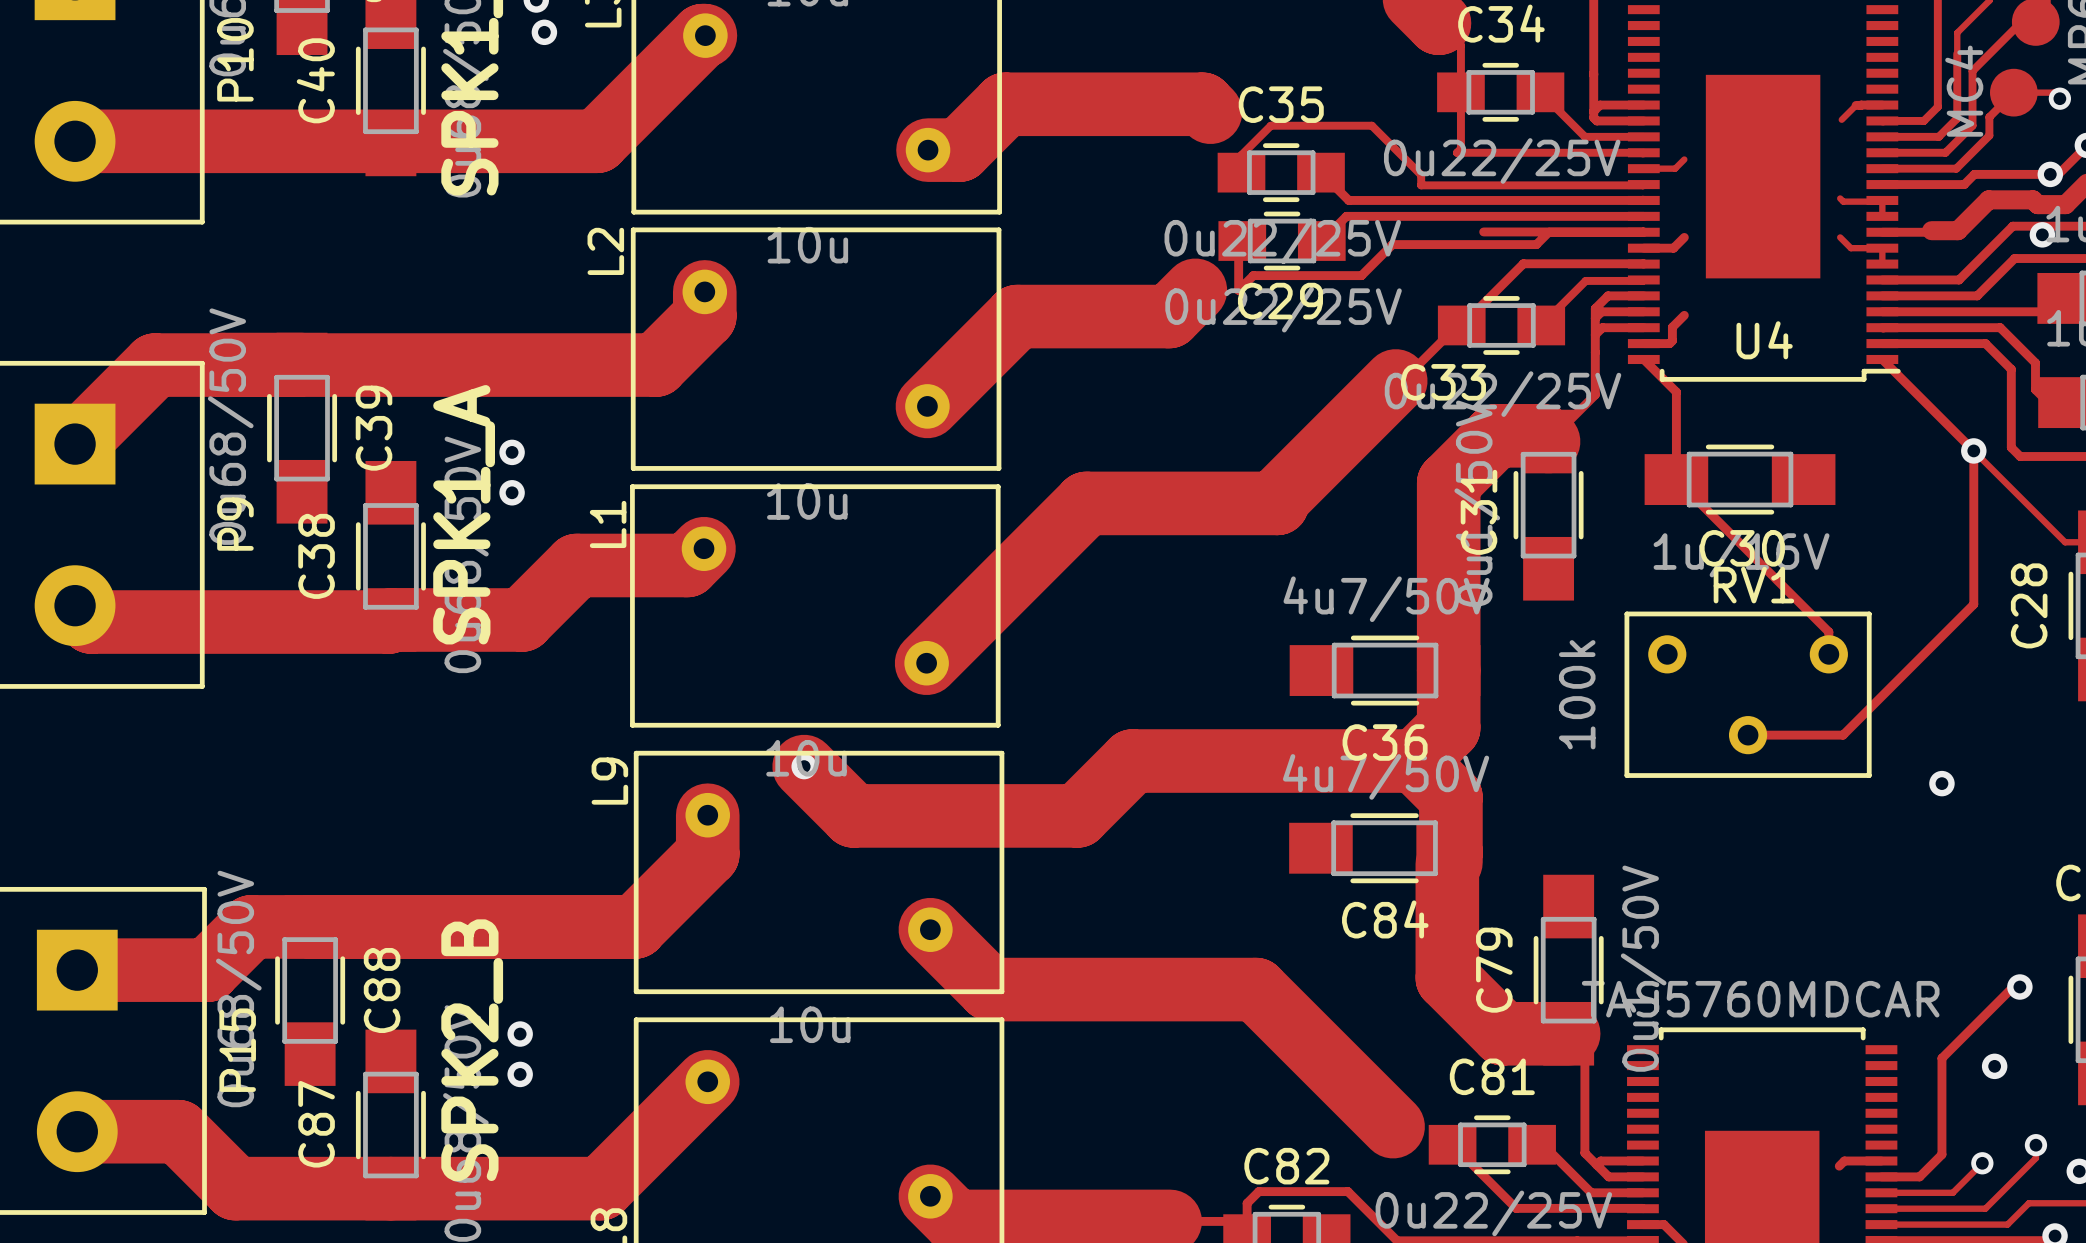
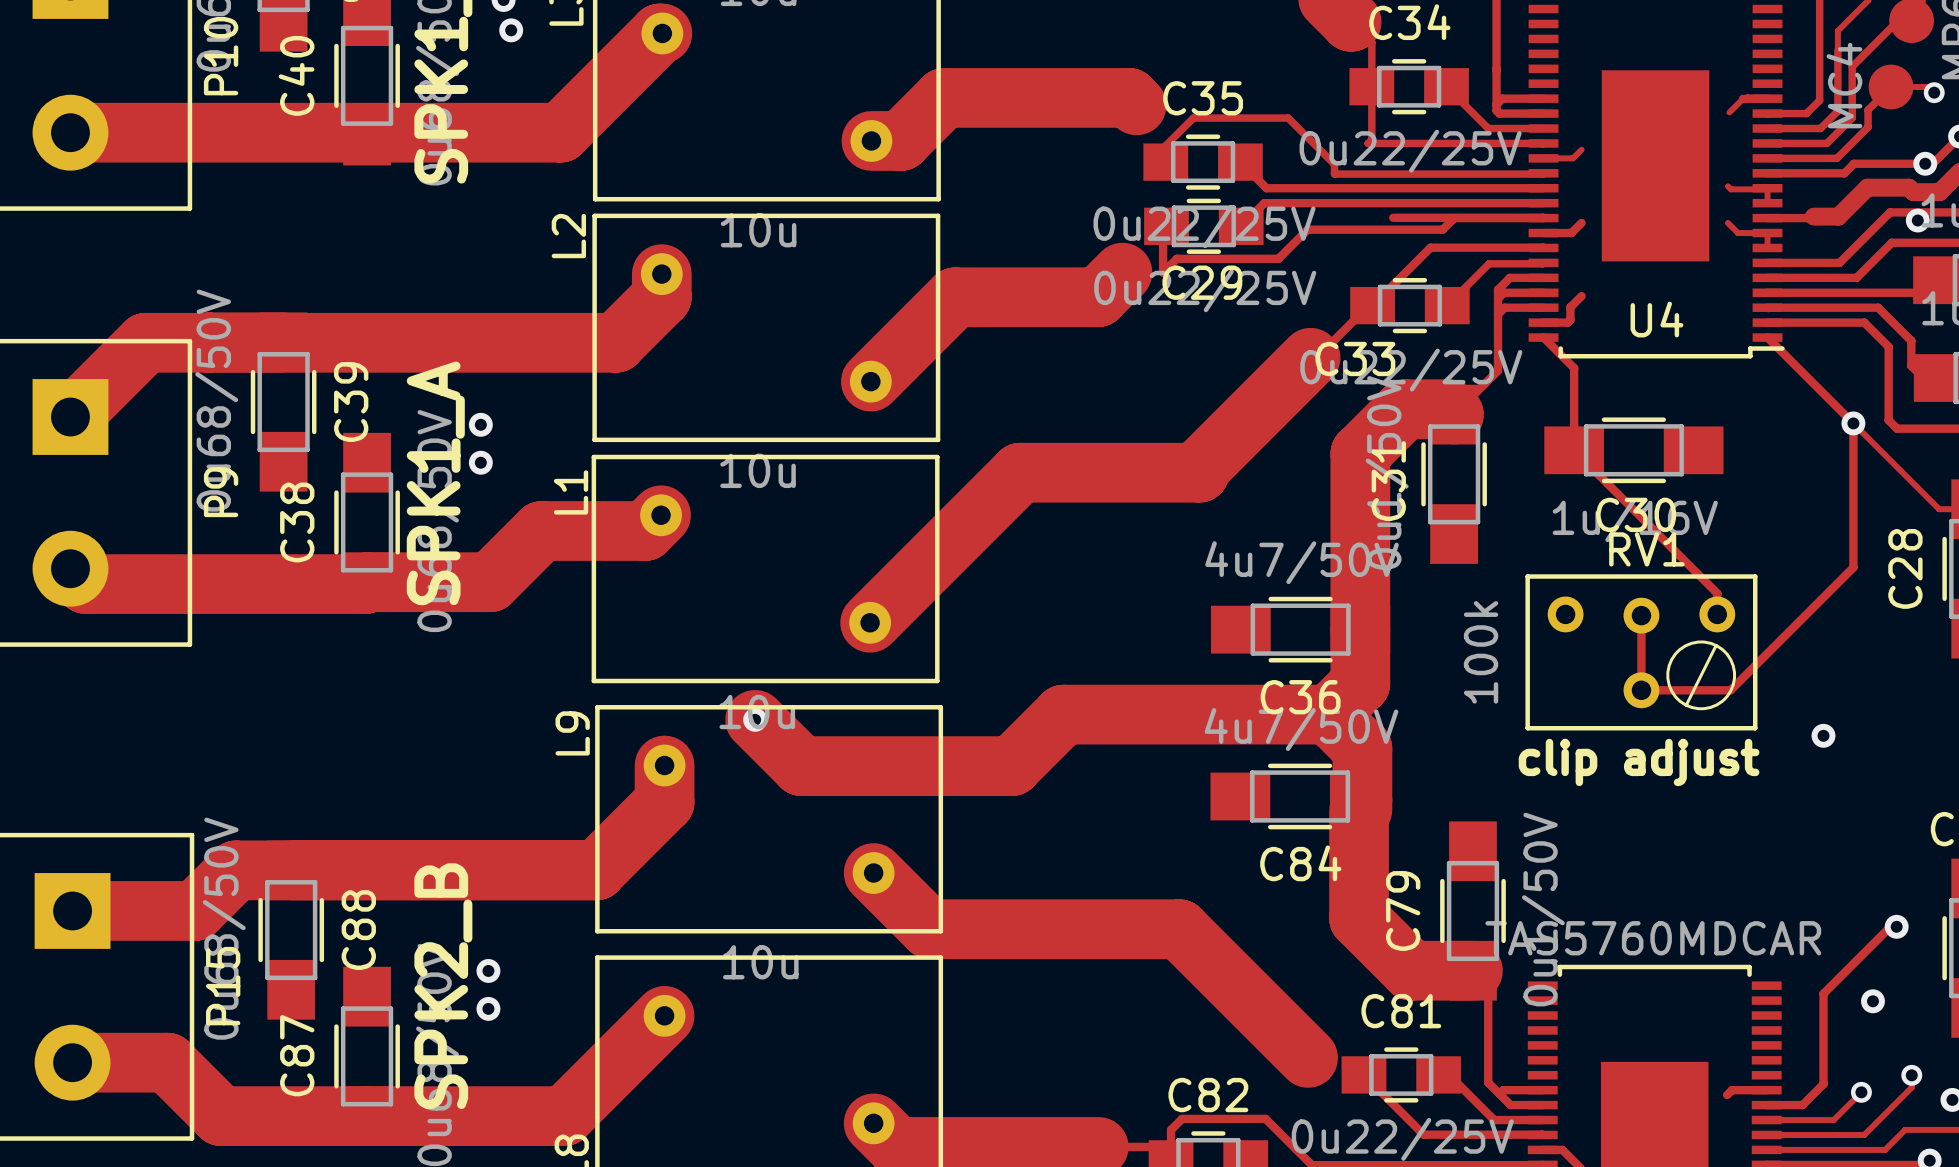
RV1 footprint: [1624, 611, 1872, 778] -> [1525, 574, 1758, 731]
track: none -> (1641, 615) (1641, 690)
text: none -> clip adjust (1639, 762)

